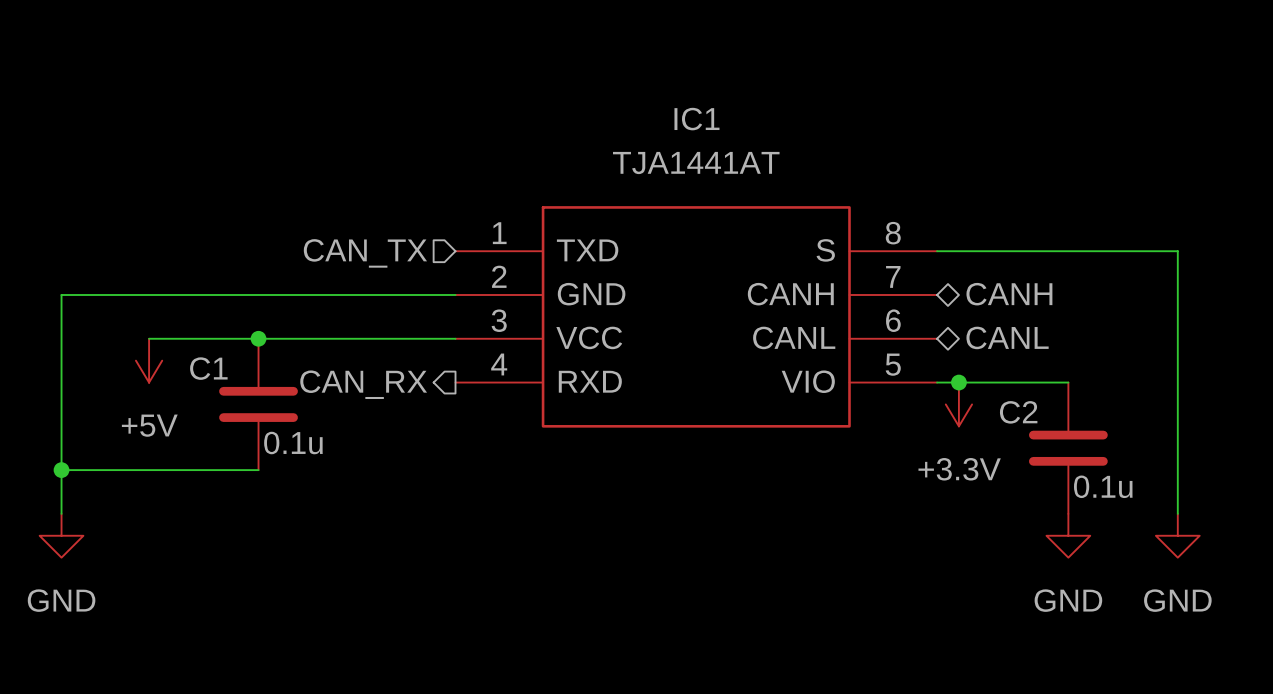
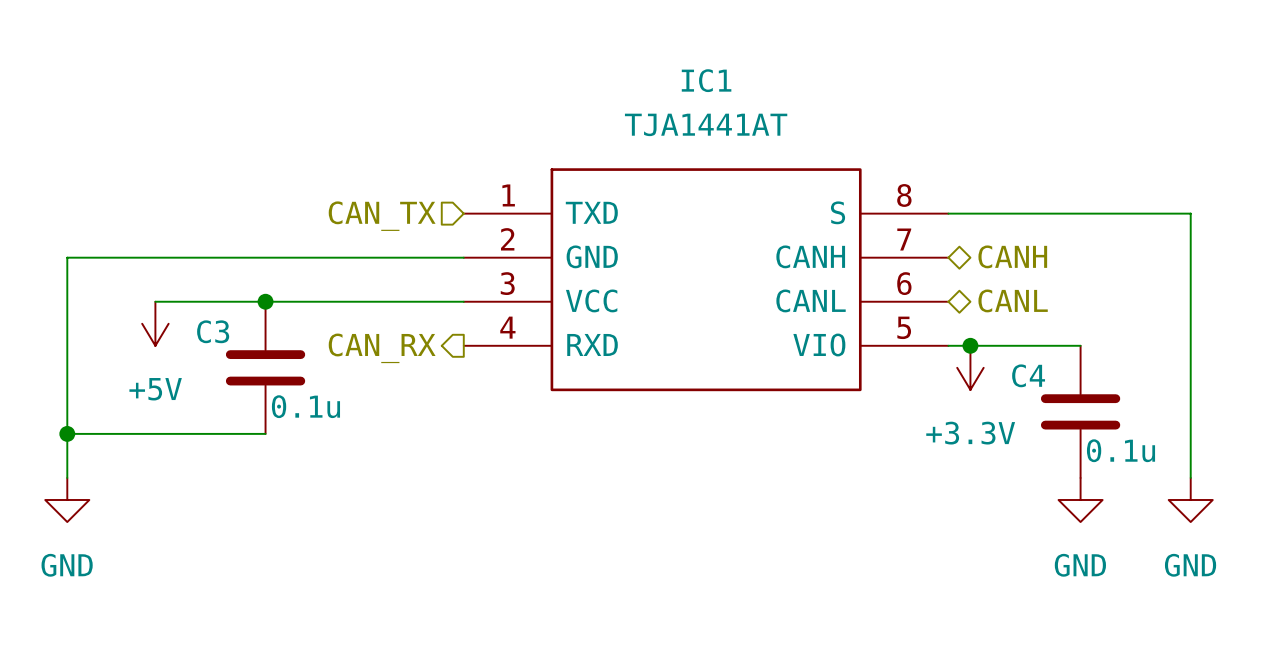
C1 name: C1 (208, 368) -> C3 (213, 331)
C2 name: C2 (1018, 412) -> C4 (1028, 375)

